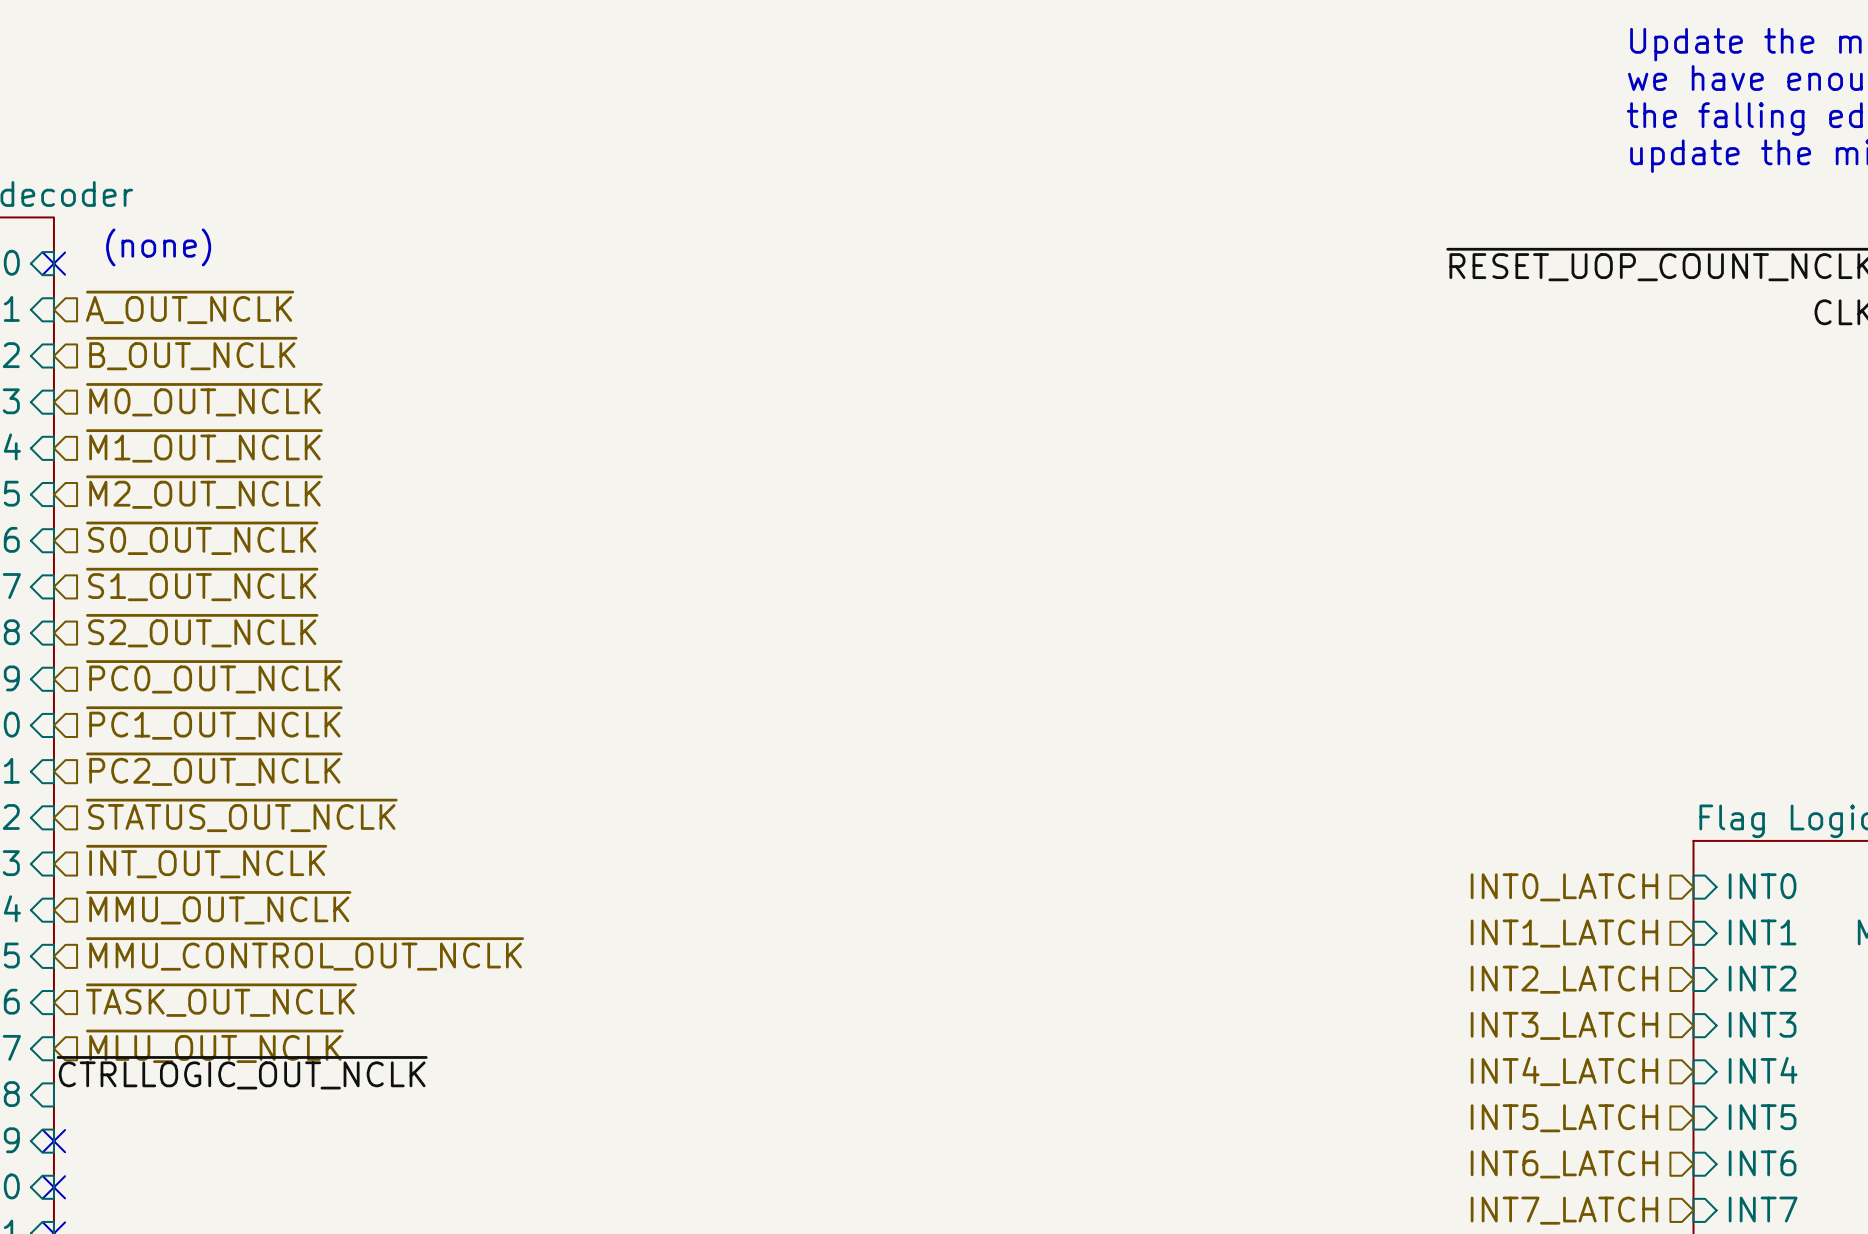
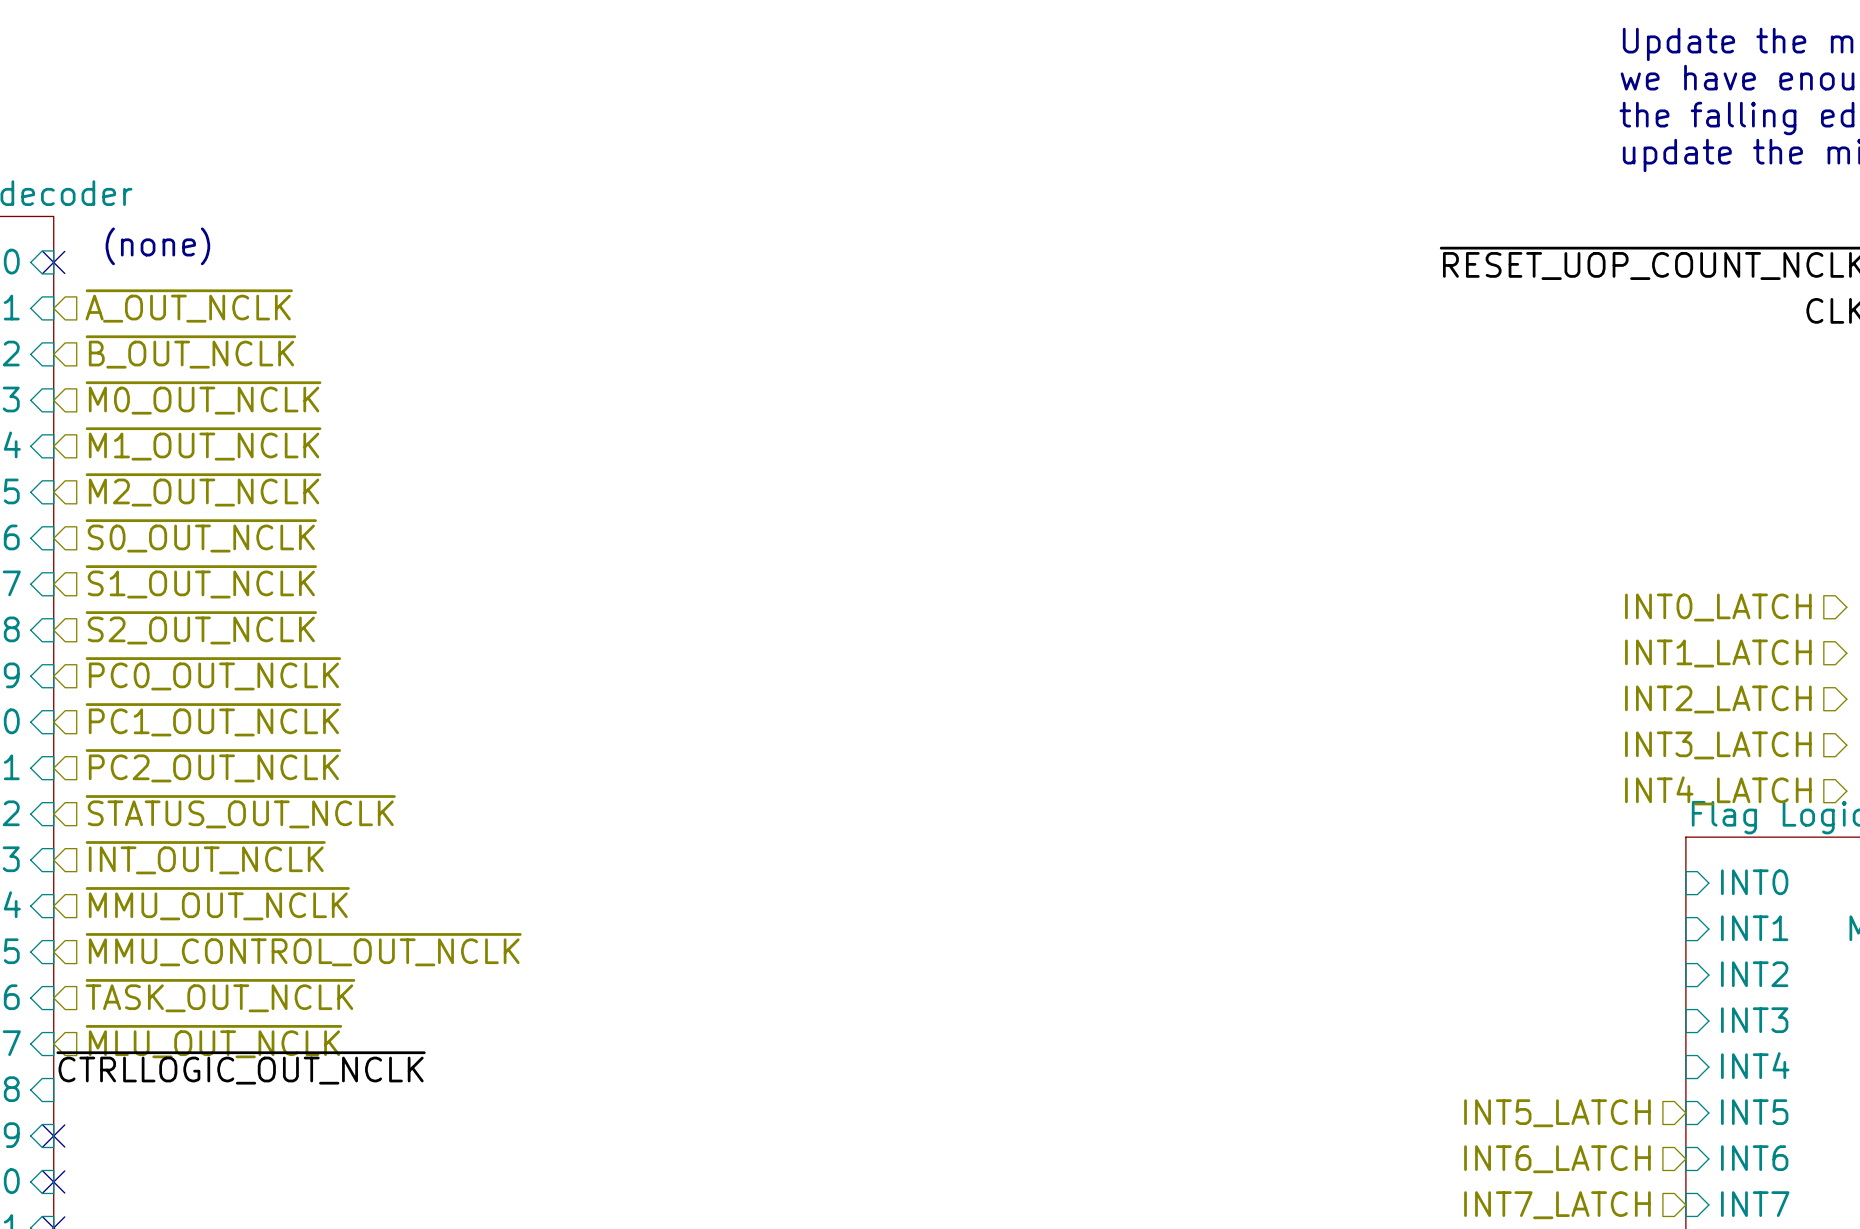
hierarchical label position: INT0_LATCH (1564, 887) -> INT0_LATCH (1718, 607)
hierarchical label position: INT1_LATCH (1564, 933) -> INT1_LATCH (1718, 653)
hierarchical label position: INT2_LATCH (1564, 979) -> INT2_LATCH (1718, 699)
hierarchical label position: INT3_LATCH (1564, 1025) -> INT3_LATCH (1718, 745)
hierarchical label position: INT4_LATCH (1564, 1071) -> INT4_LATCH (1718, 790)

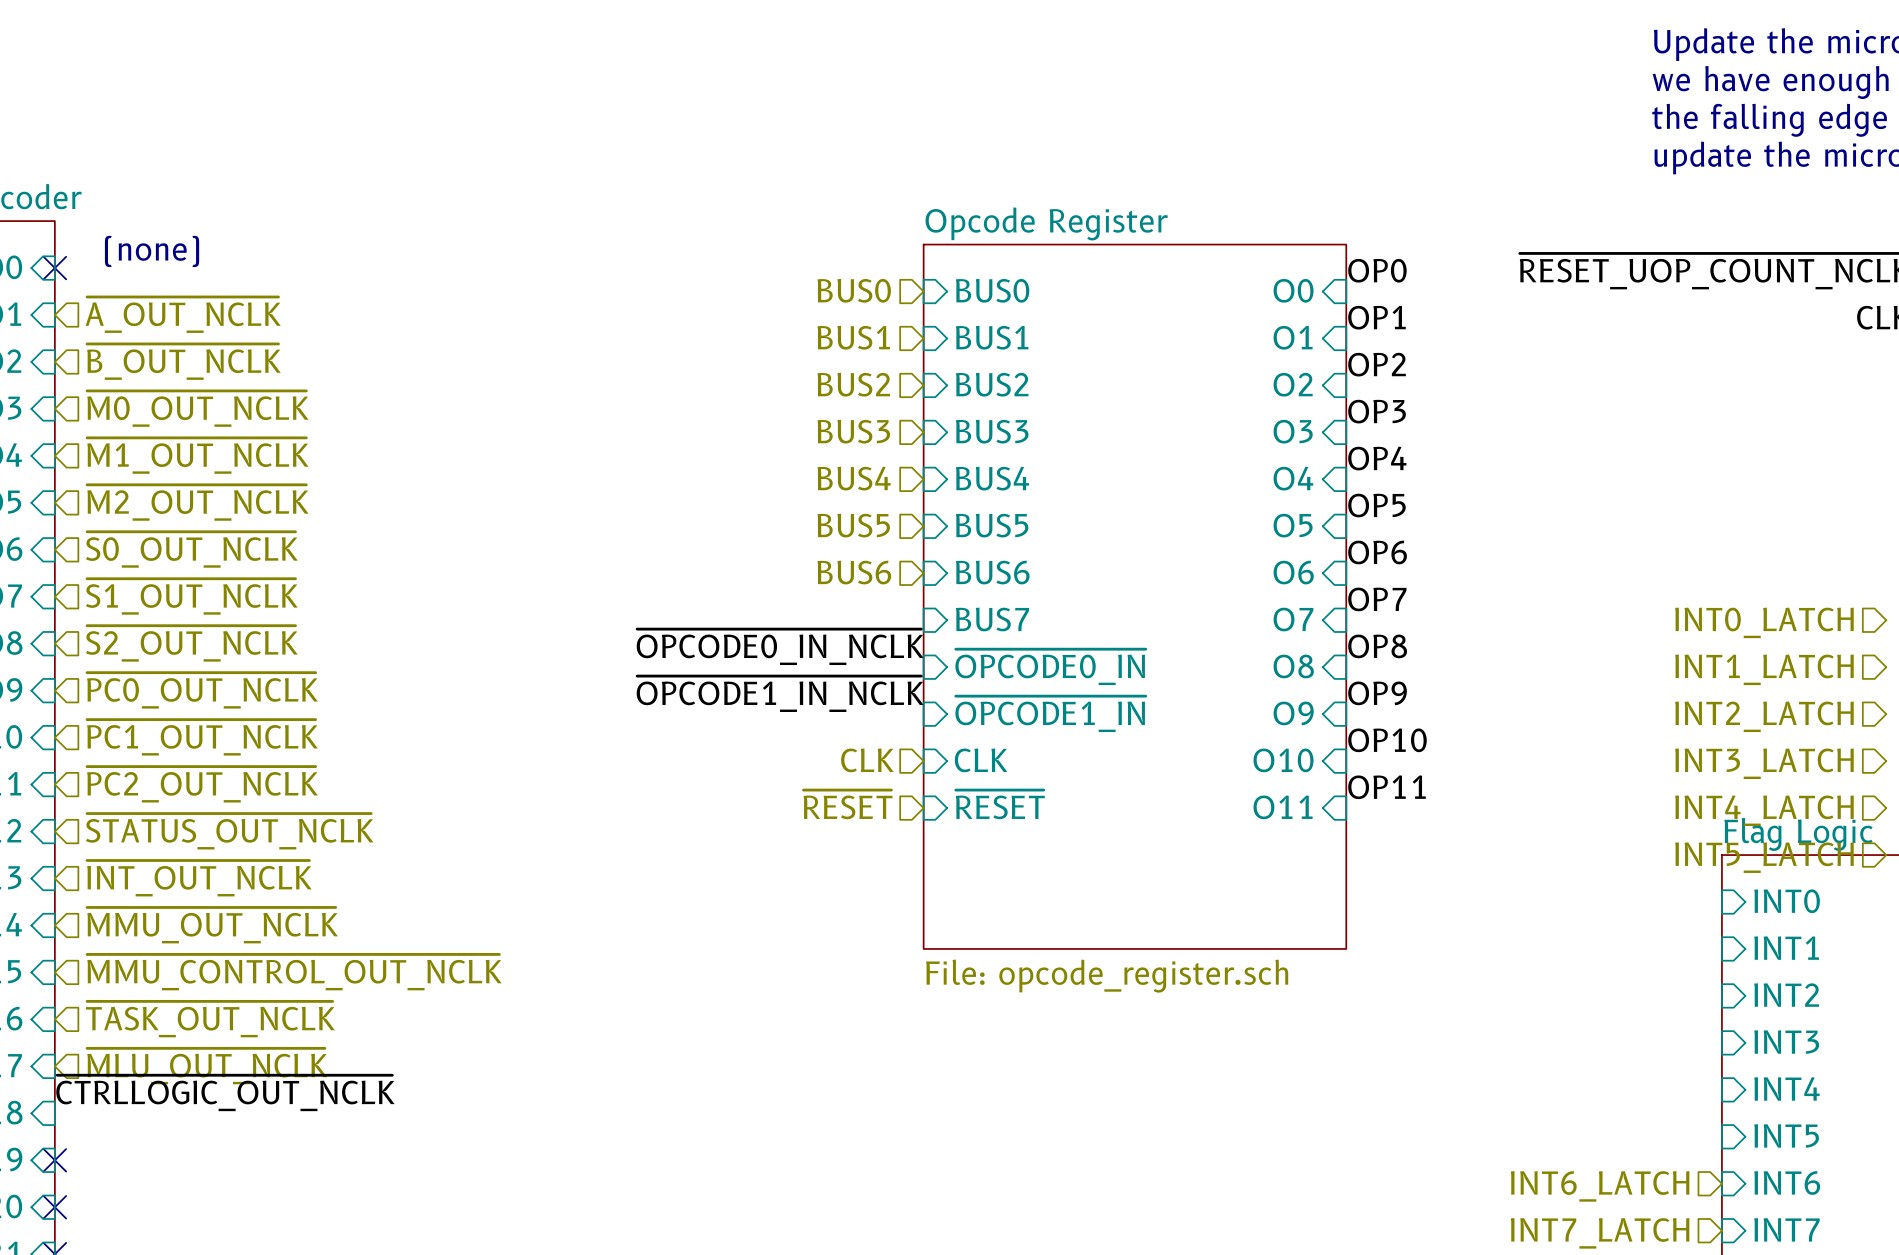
label: none -> OP0 (1377, 270)
hierarchical label: none -> BUS0 (854, 290)
sheet pin: none -> BUS0 (992, 290)
sheet pin: none -> O0 (1293, 290)
label: none -> OP1 (1376, 317)
hierarchical label: none -> BUS1 (853, 337)
sheet pin: none -> BUS1 (992, 337)
sheet pin: none -> O1 (1293, 337)
label: none -> OP2 (1377, 364)
hierarchical label: none -> BUS2 (853, 384)
sheet pin: none -> BUS2 (992, 384)
sheet pin: none -> O2 (1293, 384)
label: none -> OP3 (1377, 411)
hierarchical label: none -> BUS3 (853, 431)
sheet pin: none -> BUS3 (992, 431)
sheet pin: none -> O3 (1293, 431)
label: none -> OP4 (1377, 458)
hierarchical label: none -> BUS4 (854, 478)
sheet pin: none -> BUS4 (992, 478)
sheet pin: none -> O4 (1293, 478)
label: none -> OP5 (1376, 505)
hierarchical label: none -> BUS5 (853, 525)
sheet pin: none -> BUS5 (992, 525)
sheet pin: none -> O5 (1293, 525)
label: none -> OP6 (1377, 552)
hierarchical label: none -> BUS6 (854, 572)
sheet pin: none -> BUS6 (992, 572)
sheet pin: none -> O6 (1293, 572)
sheet Opcode Register: none -> File: opcode_register.sch (1134, 596)
label: none -> OP7 (1377, 599)
sheet pin: none -> BUS7 (992, 619)
sheet pin: none -> O7 (1293, 619)
label: none -> ~{OPCODE0_IN_NCLK} (780, 647)
label: none -> OP8 (1377, 646)
sheet pin: none -> ~{OPCODE0_IN} (1050, 667)
sheet pin: none -> O8 (1293, 666)
label: none -> ~{OPCODE1_IN_NCLK} (780, 694)
label: none -> OP9 (1377, 693)
sheet pin: none -> ~{OPCODE1_IN} (1050, 714)
sheet pin: none -> O9 (1293, 713)
label: none -> OP10 (1387, 740)
hierarchical label: none -> CLK (867, 760)
sheet pin: none -> CLK (981, 760)
sheet pin: none -> O10 (1283, 760)
label: none -> OP11 (1387, 787)
hierarchical label: none -> ~{RESET} (847, 804)
sheet pin: none -> ~{RESET} (1000, 804)
sheet pin: none -> O11 (1283, 807)
hierarchical label position: INT5_LATCH (1557, 1113) -> INT5_LATCH (1764, 857)

